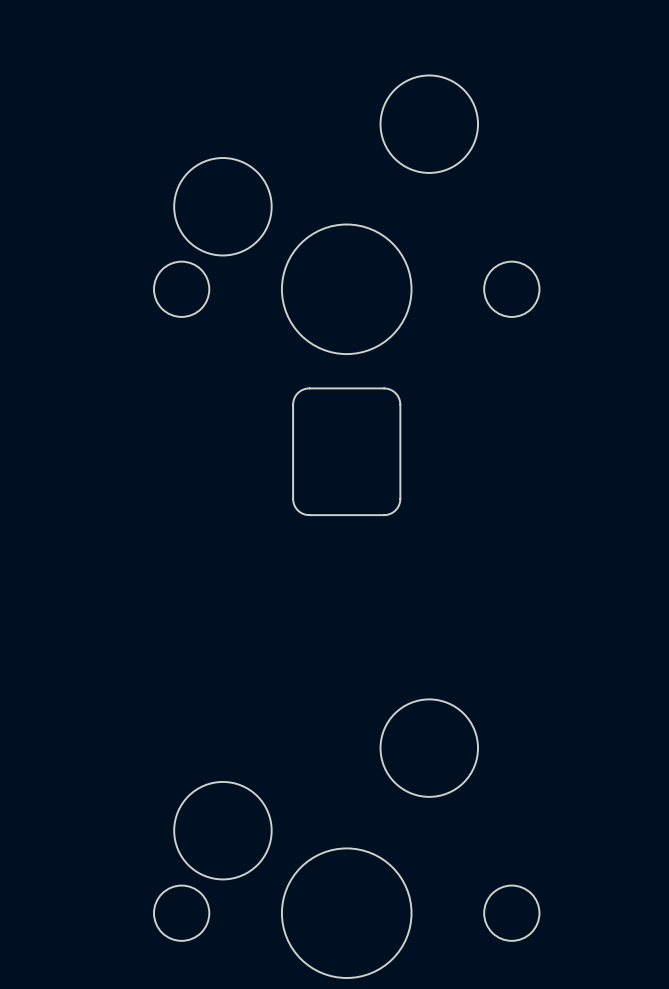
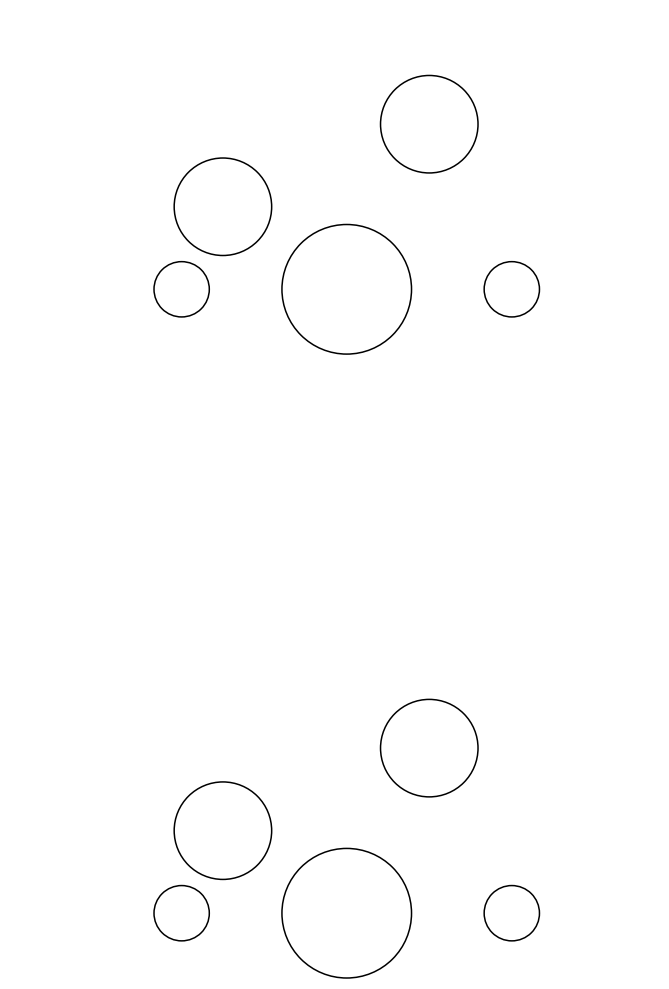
part: (346, 451) -> none

